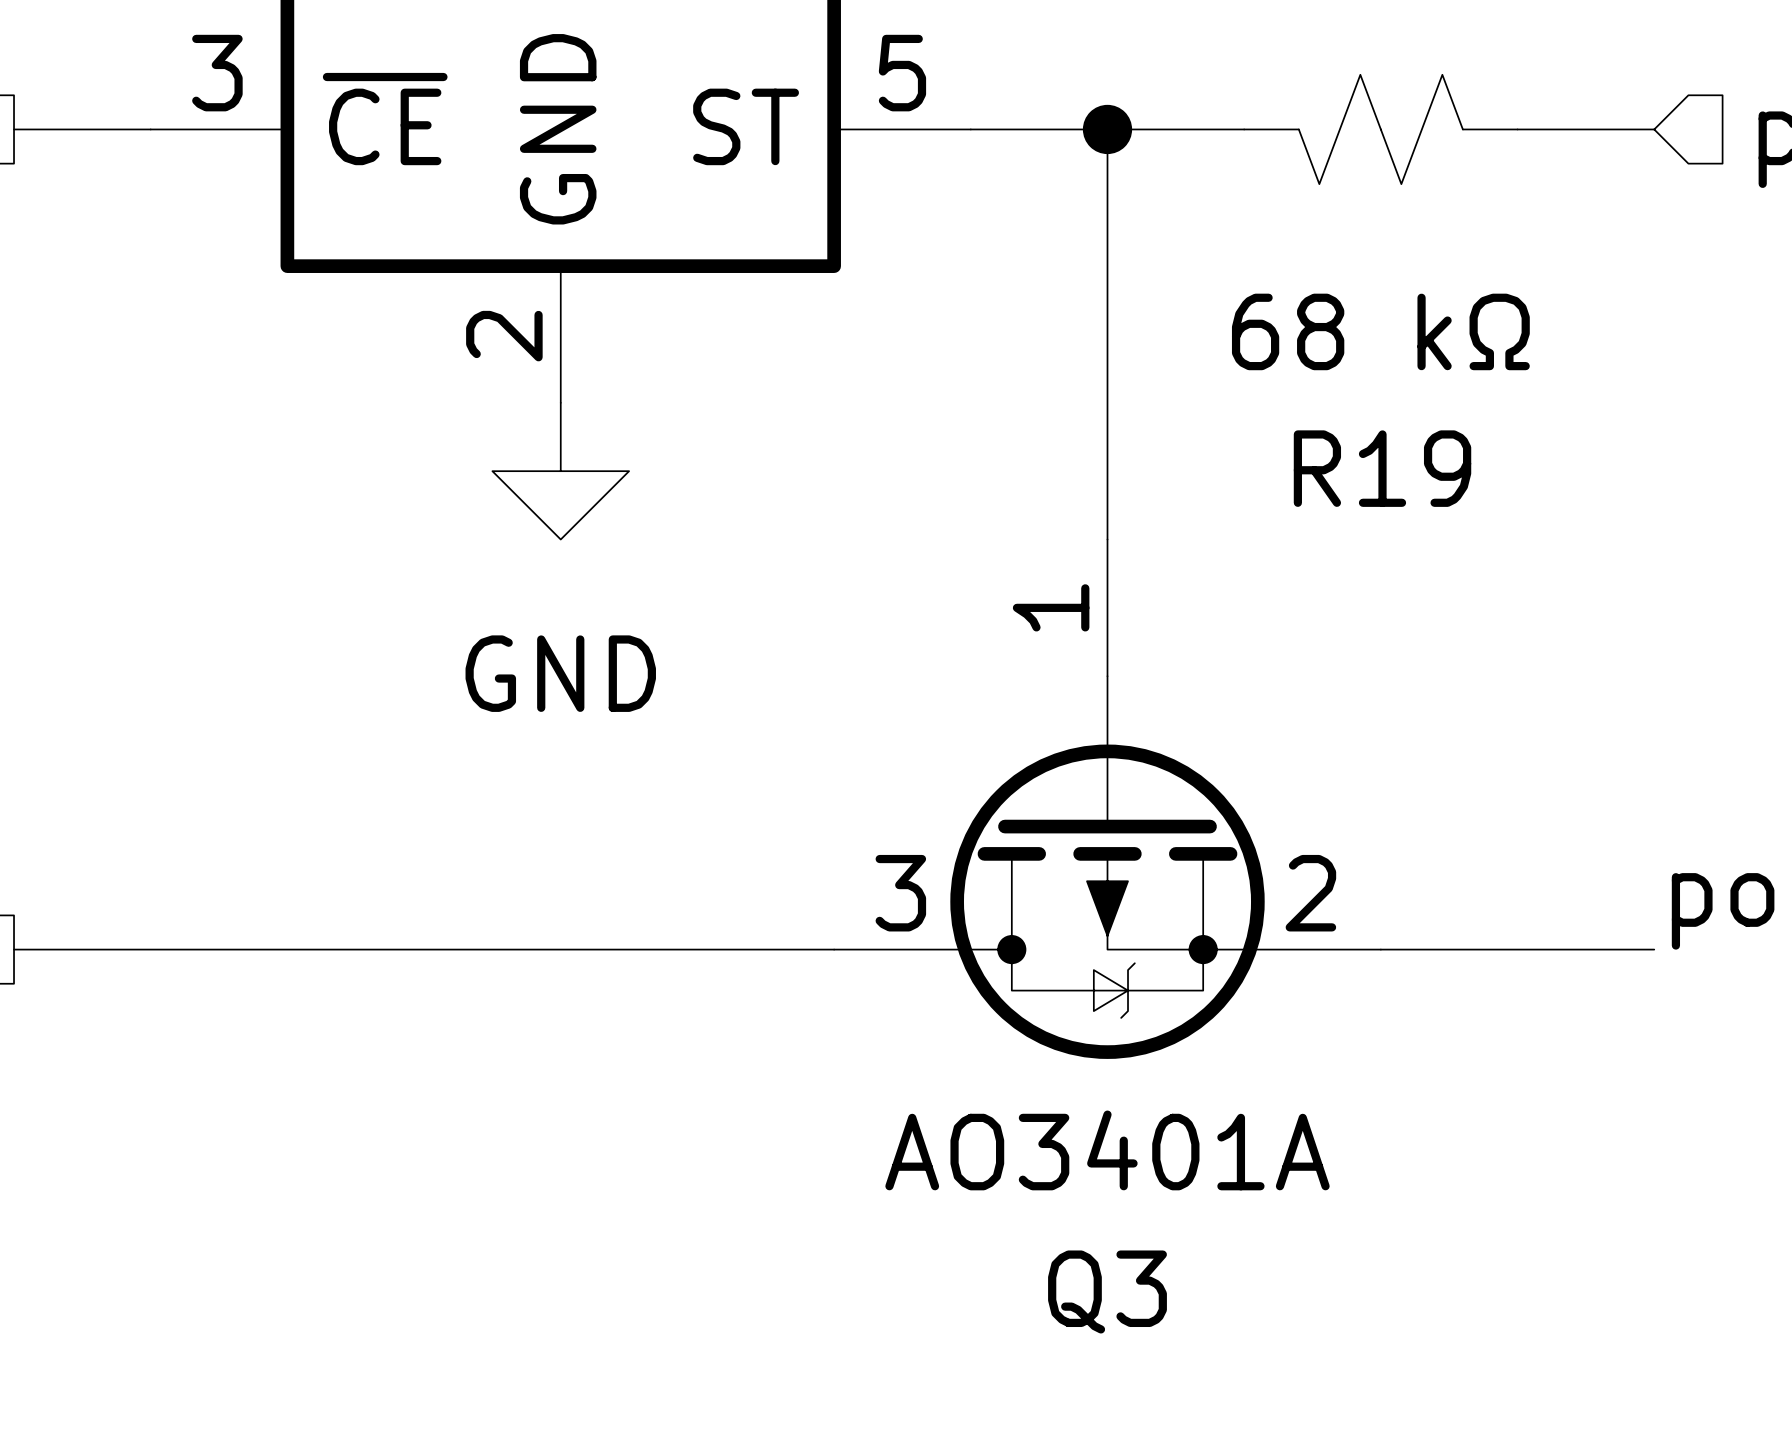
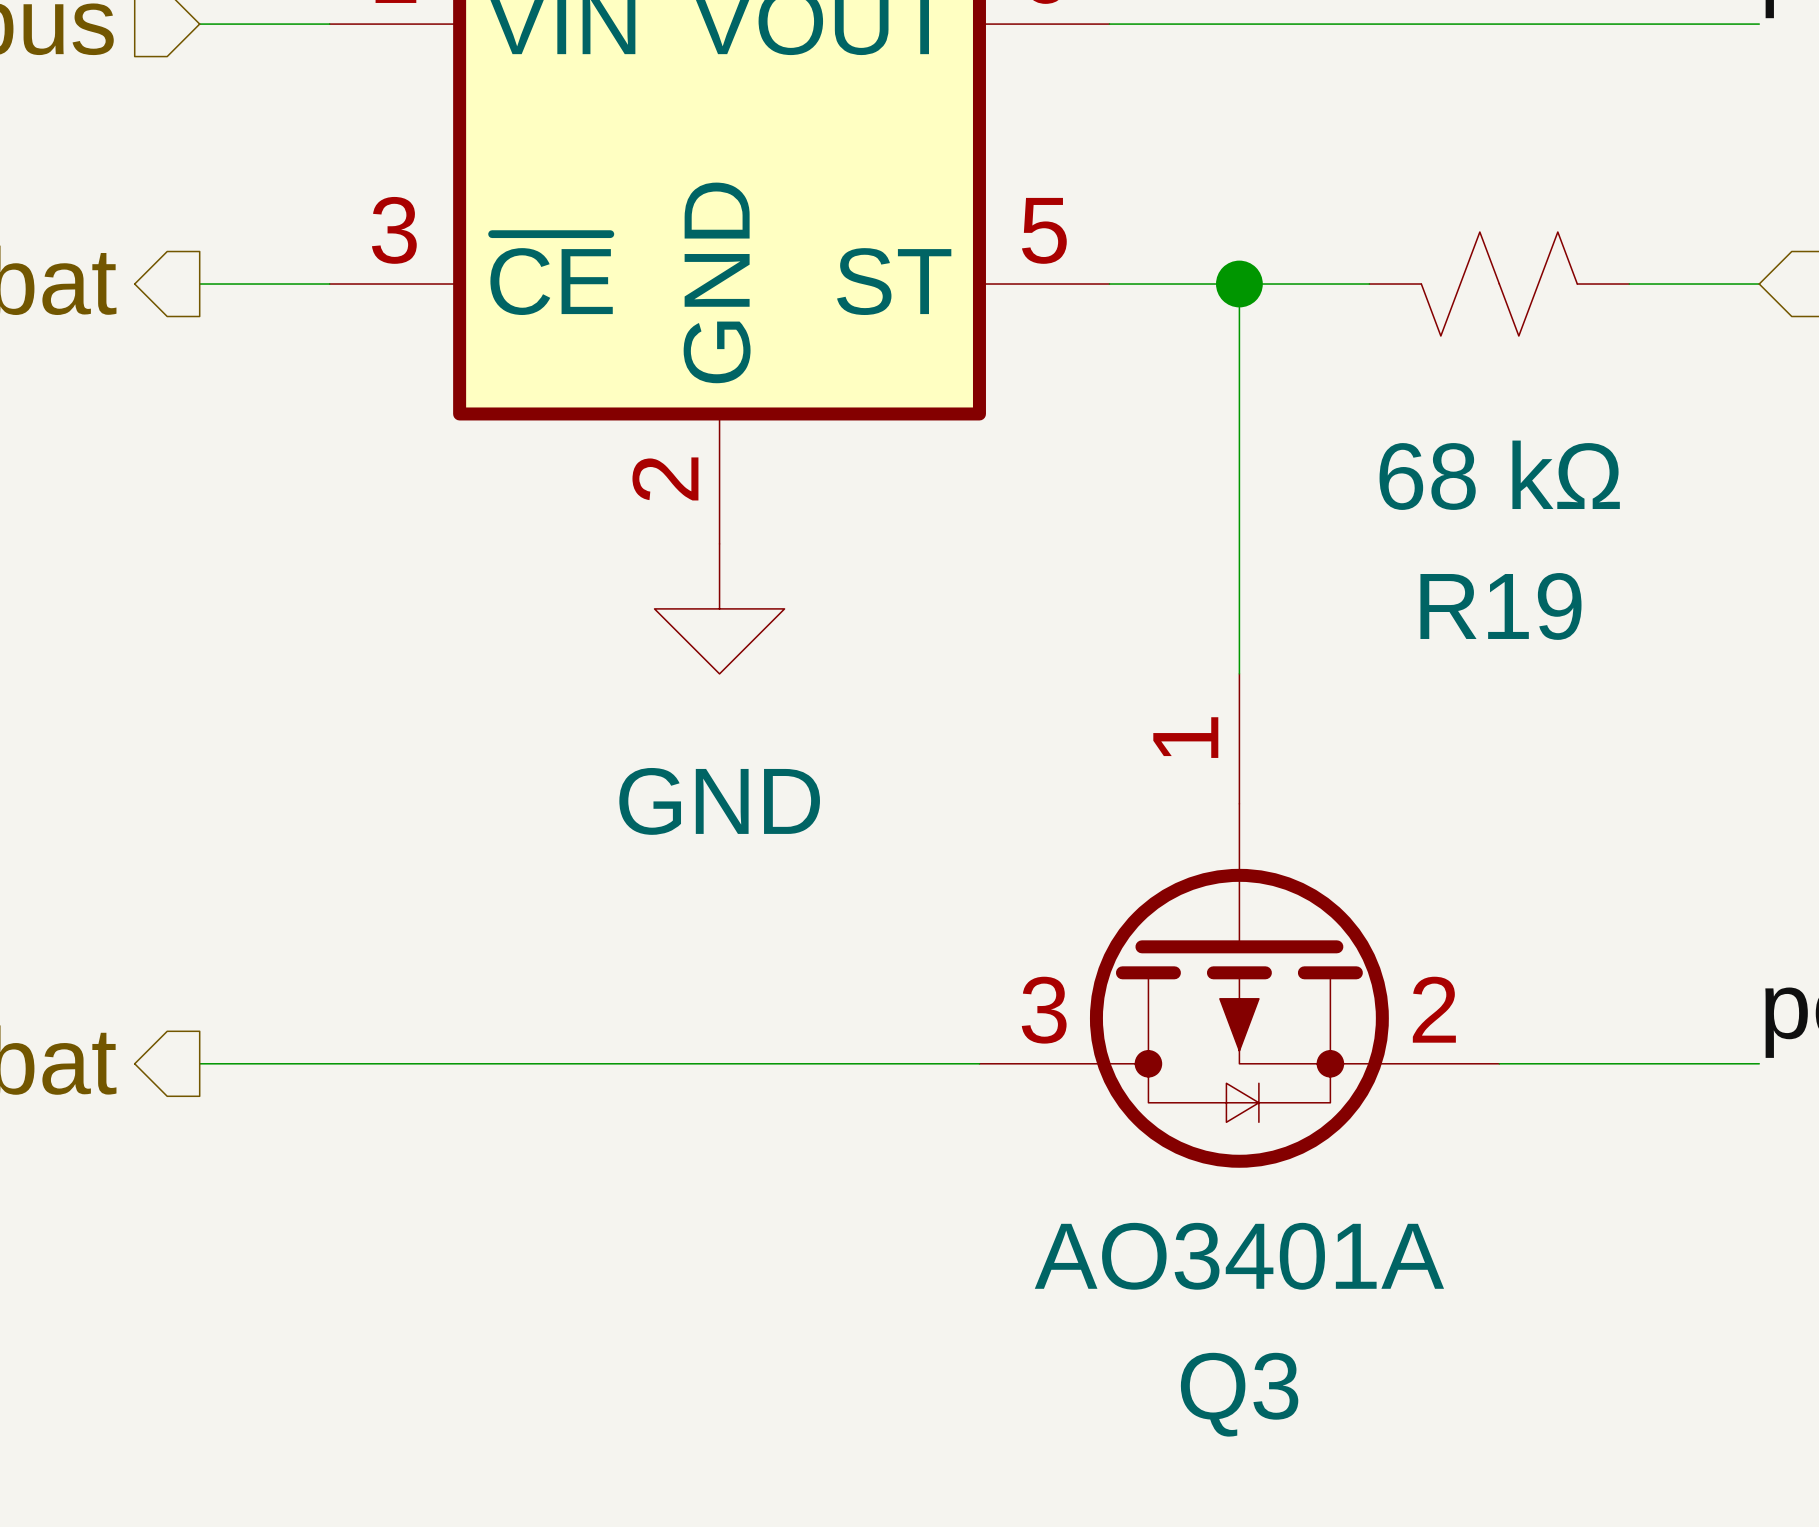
Q3 symbol: [834, 539, 1381, 1059] -> [979, 673, 1500, 1168]

